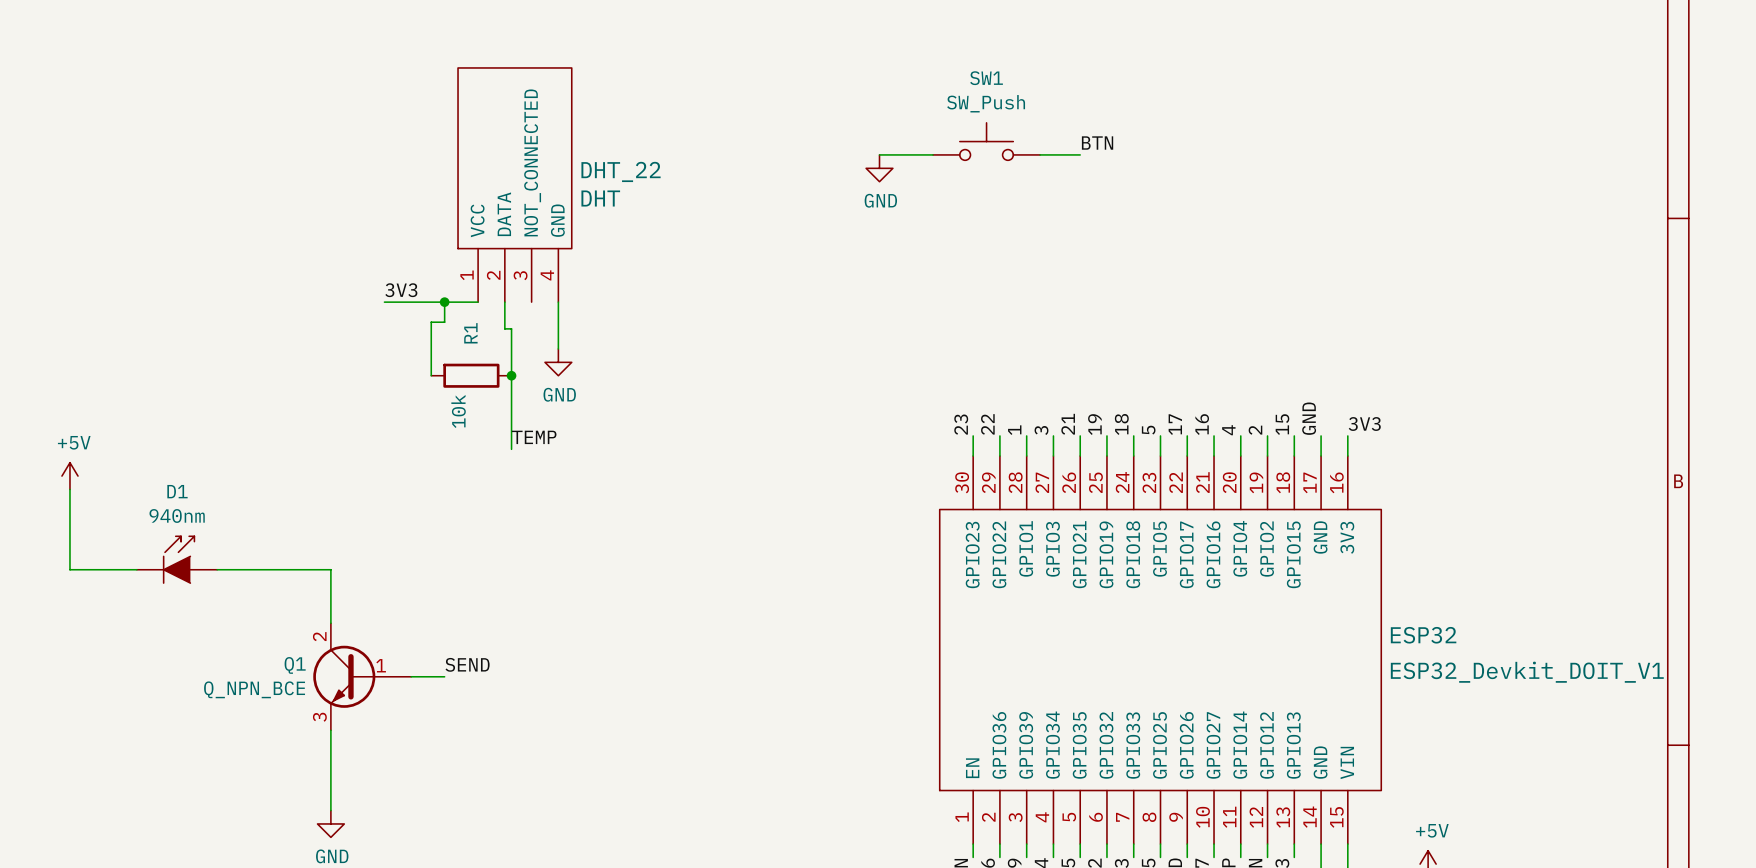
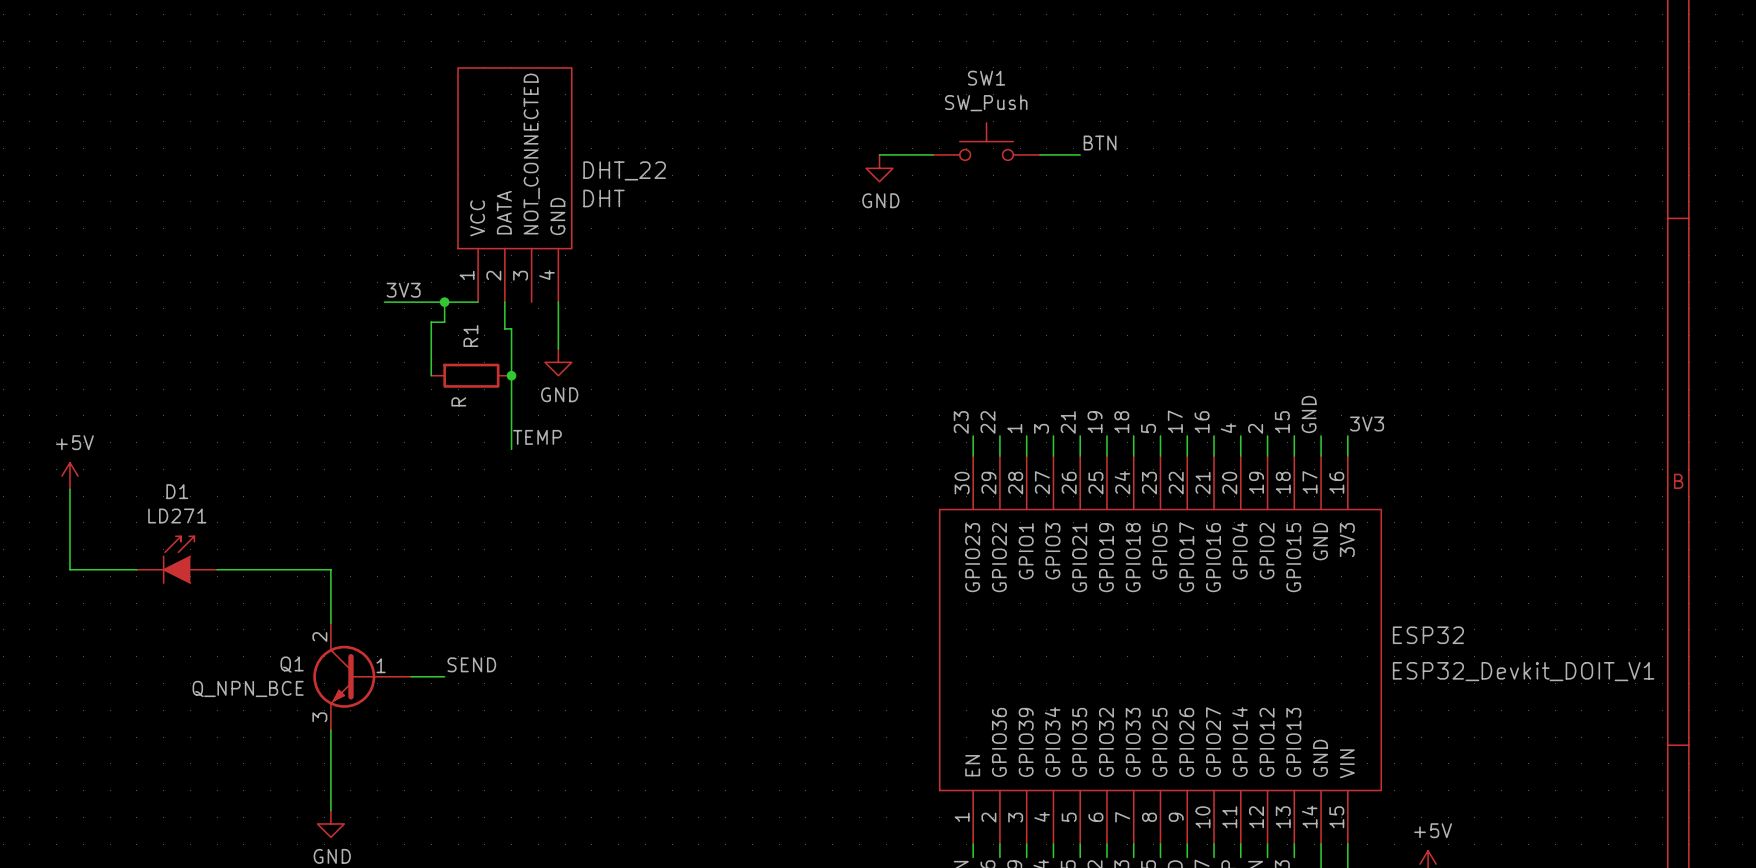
R1 value: 10k (458, 411) -> R (458, 401)
D1 value: 940nm (177, 515) -> LD271 (177, 515)

